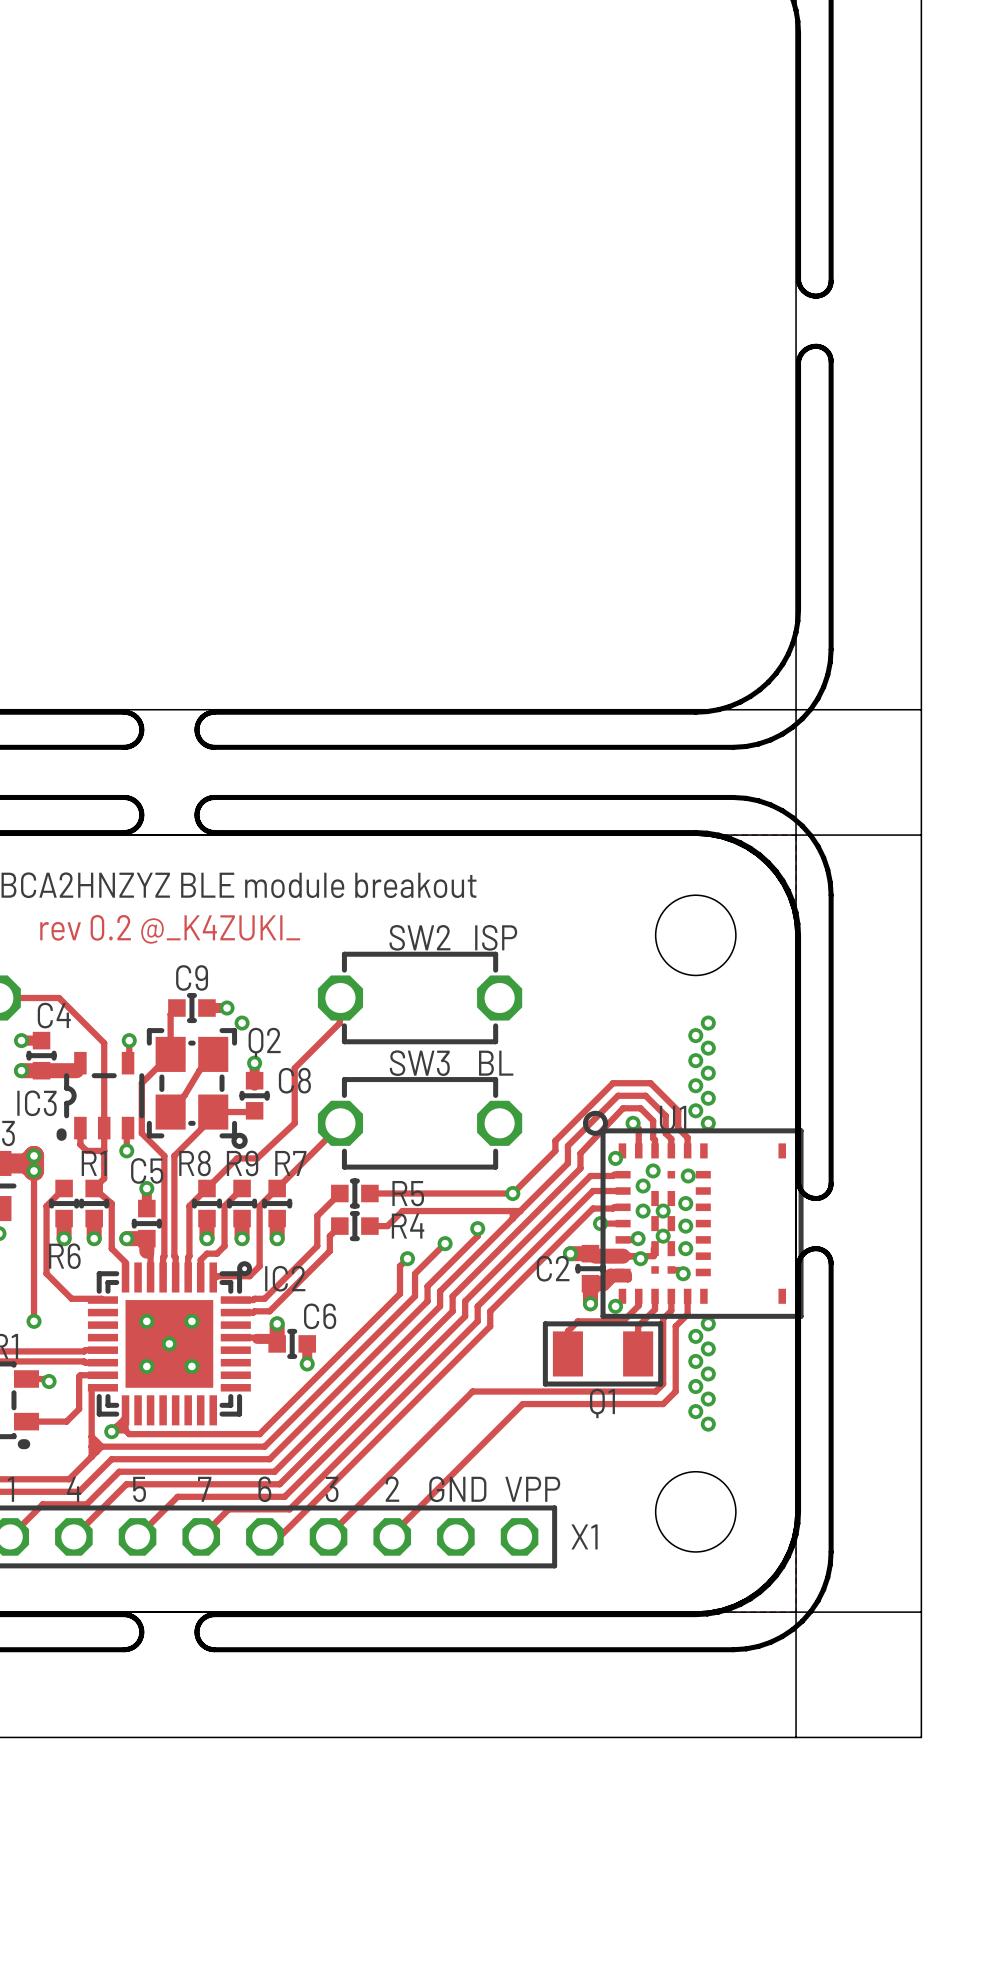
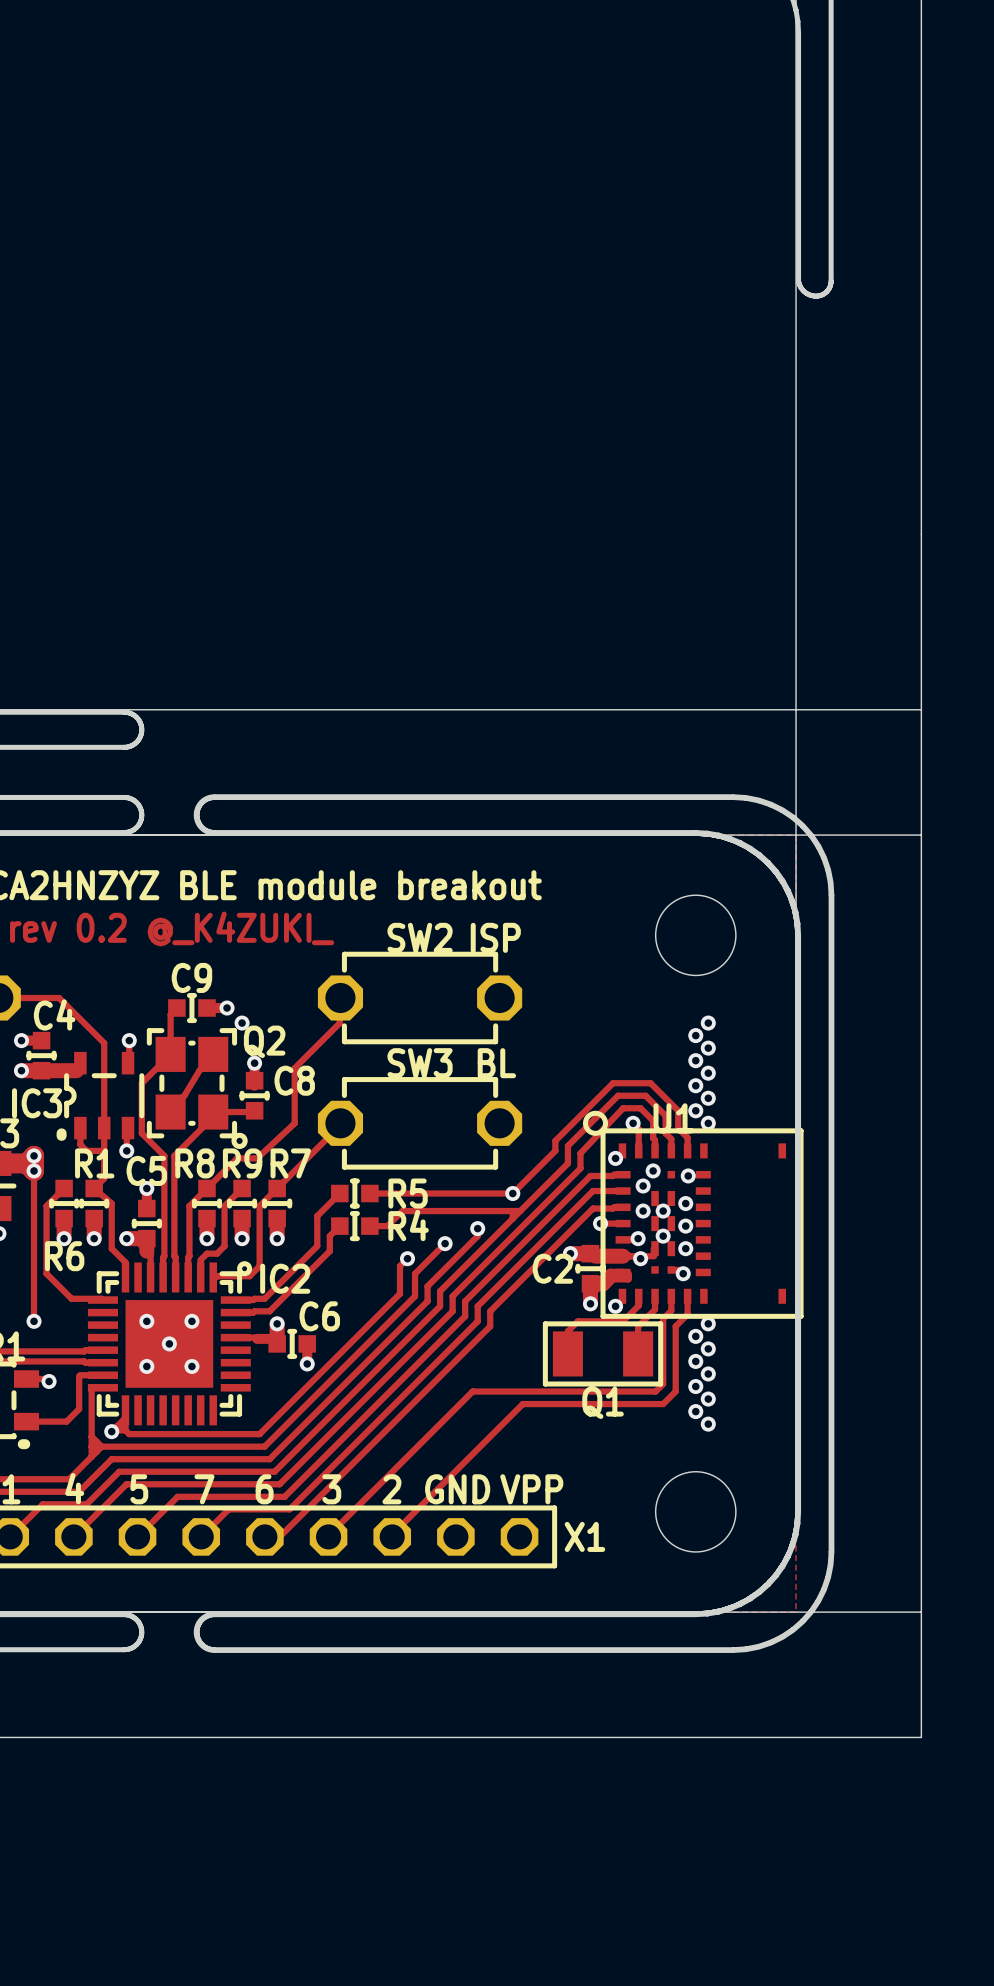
board edge: (813, 346) (825, 349) (829, 353) (831, 361) (830, 662) (823, 686) (810, 709) (792, 727) (782, 734) (758, 744) (733, 747) (214, 747) (205, 744) (199, 738) (196, 729) (198, 723) (203, 715) (212, 712) (695, 712) (718, 709) (750, 696) (768, 682) (782, 664) (795, 632) (798, 609) (798, 361) (804, 350) (813, 346) -> none
board edge: none -> (214, 835) (206, 833) (200, 829) (194, 817) (195, 809) (198, 802) (204, 797) (211, 795) (746, 795) (759, 798) (783, 808) (804, 824) (820, 845) (826, 856) (832, 882) (833, 895) (833, 1551) (830, 1577) (820, 1602) (812, 1612) (804, 1622) (783, 1638) (759, 1648) (746, 1651) (214, 1652) (206, 1650) (200, 1646) (195, 1639) (194, 1632) (195, 1624) (200, 1617) (206, 1613) (214, 1612)
board edge: (798, 1183) (804, 1194) (816, 1198) (826, 1194) (831, 1183) -> (798, 1183) (798, 1263)
board edge: (798, 1263) (804, 1252) (816, 1248) (826, 1253) (831, 1263) -> (831, 1183) (831, 1263)
board edge: (796, 1511) (796, 1737) -> none

